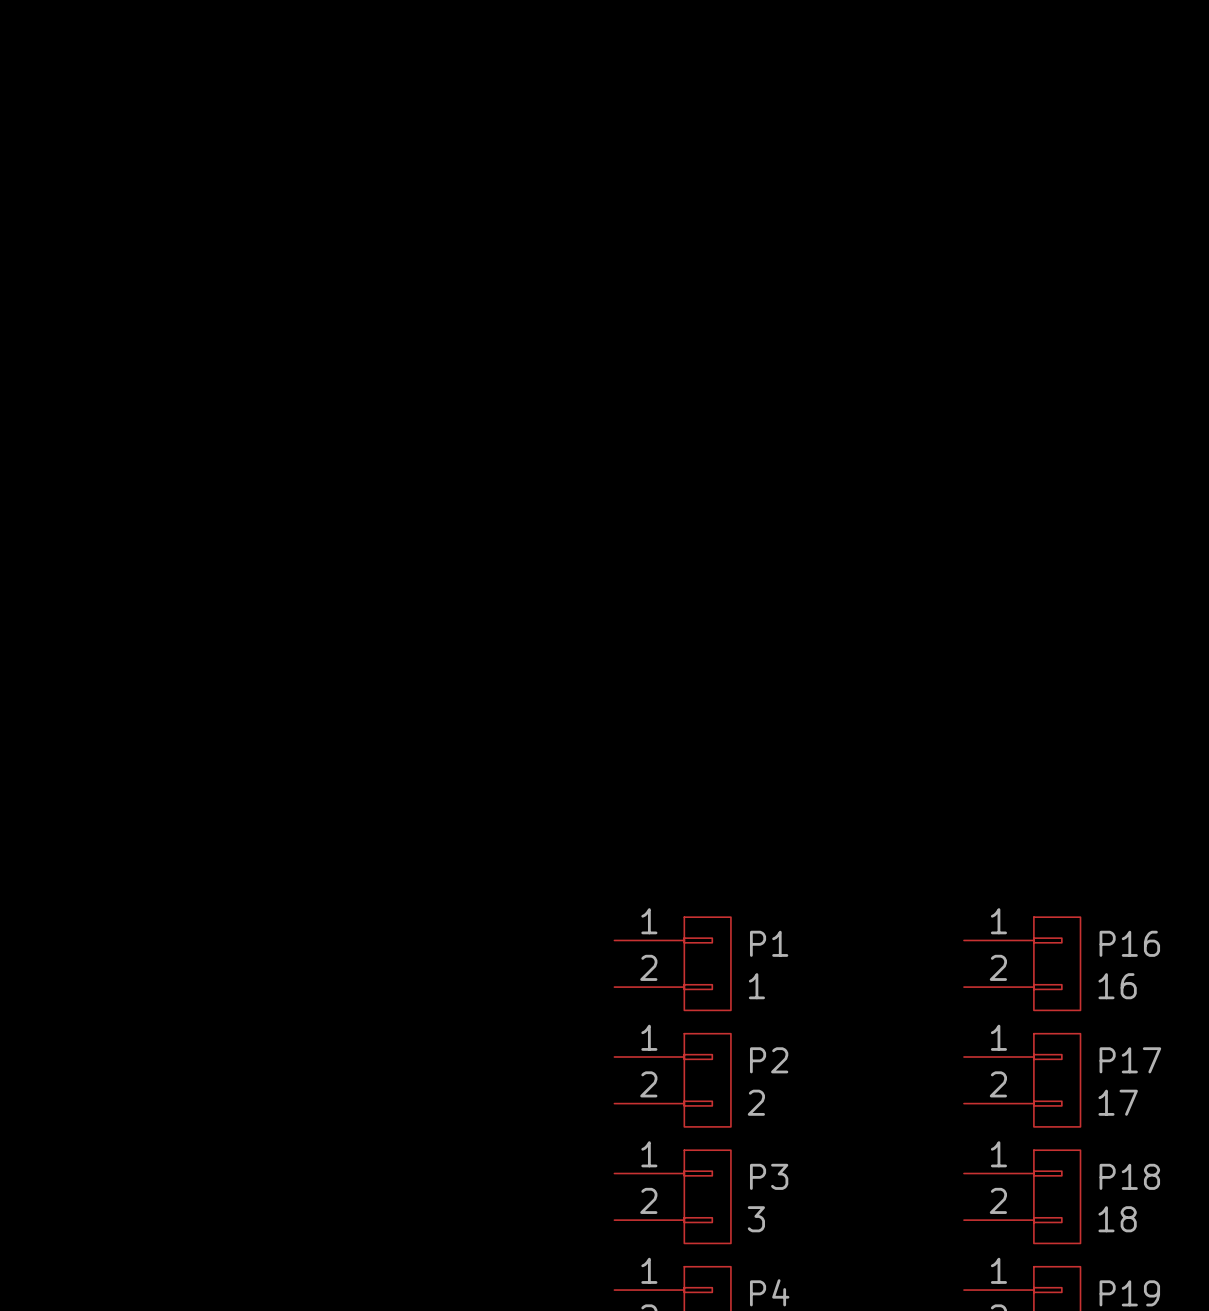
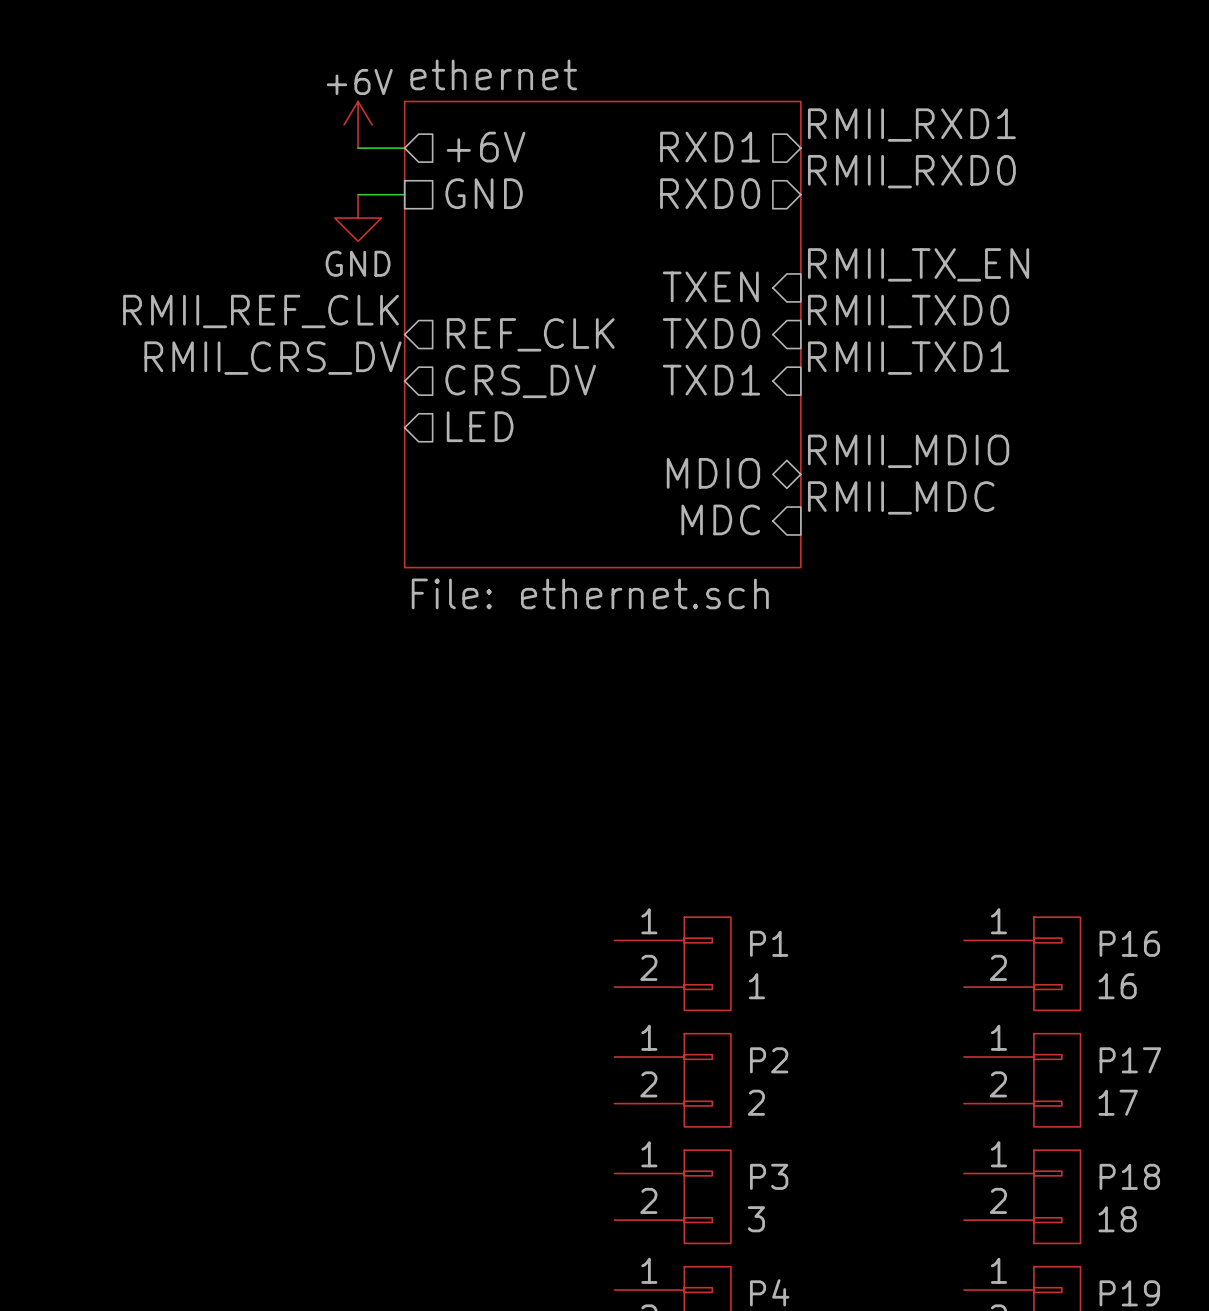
power symbol: none -> +6V (358, 124)
label: none -> RMII_RXD1 (911, 125)
sheet pin: none -> +6V (486, 147)
sheet pin: none -> RXD1 (710, 147)
wire: none -> (358, 148) (404, 148)
label: none -> RMII_RXD0 (911, 171)
sheet pin: none -> GND (484, 193)
sheet pin: none -> RXD0 (710, 193)
wire: none -> (358, 194) (404, 194)
power symbol: none -> GND (358, 218)
label: none -> RMII_TX_EN (918, 264)
sheet pin: none -> TXEN (710, 286)
label: none -> RMII_REF_CLK (261, 311)
label: none -> RMII_TXD0 (908, 311)
sheet pin: none -> TXD0 (711, 333)
sheet pin: none -> REF_CLK (530, 334)
sheet ethernet: none -> File: ethernet.sch (602, 334)
label: none -> RMII_CRS_DV (272, 358)
label: none -> RMII_TXD1 (908, 358)
sheet pin: none -> TXD1 (711, 380)
sheet pin: none -> CRS_DV (520, 381)
sheet pin: none -> LED (480, 426)
label: none -> RMII_MDIO (908, 451)
sheet pin: none -> MDIO (713, 473)
label: none -> RMII_MDC (901, 497)
sheet pin: none -> MDC (720, 519)

